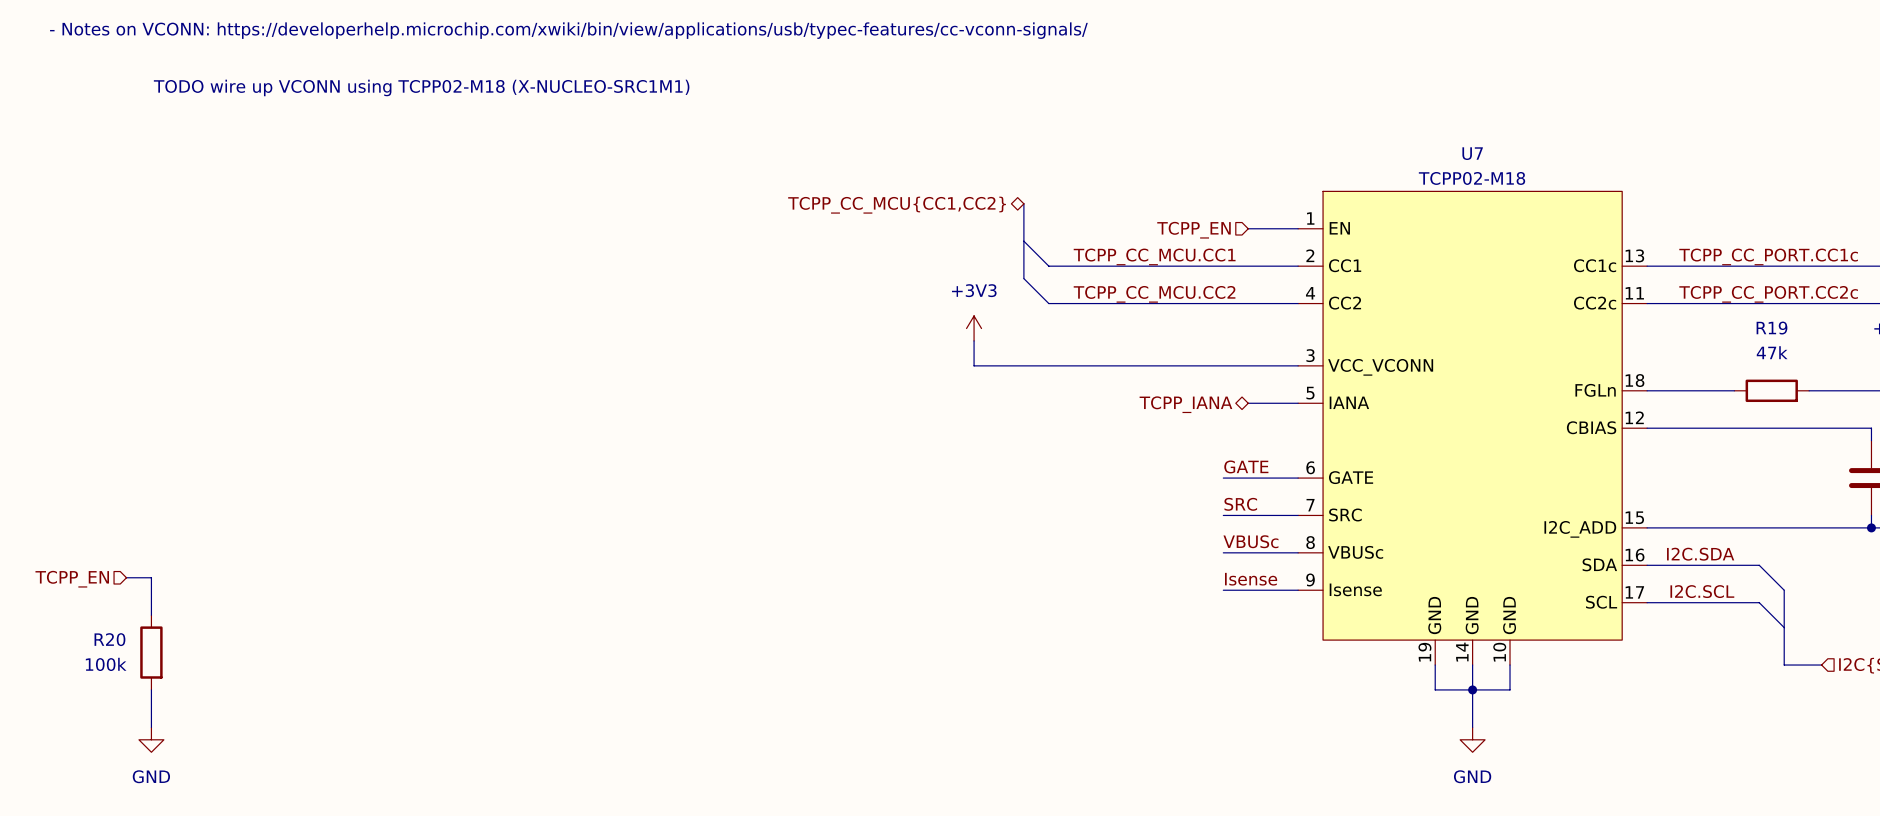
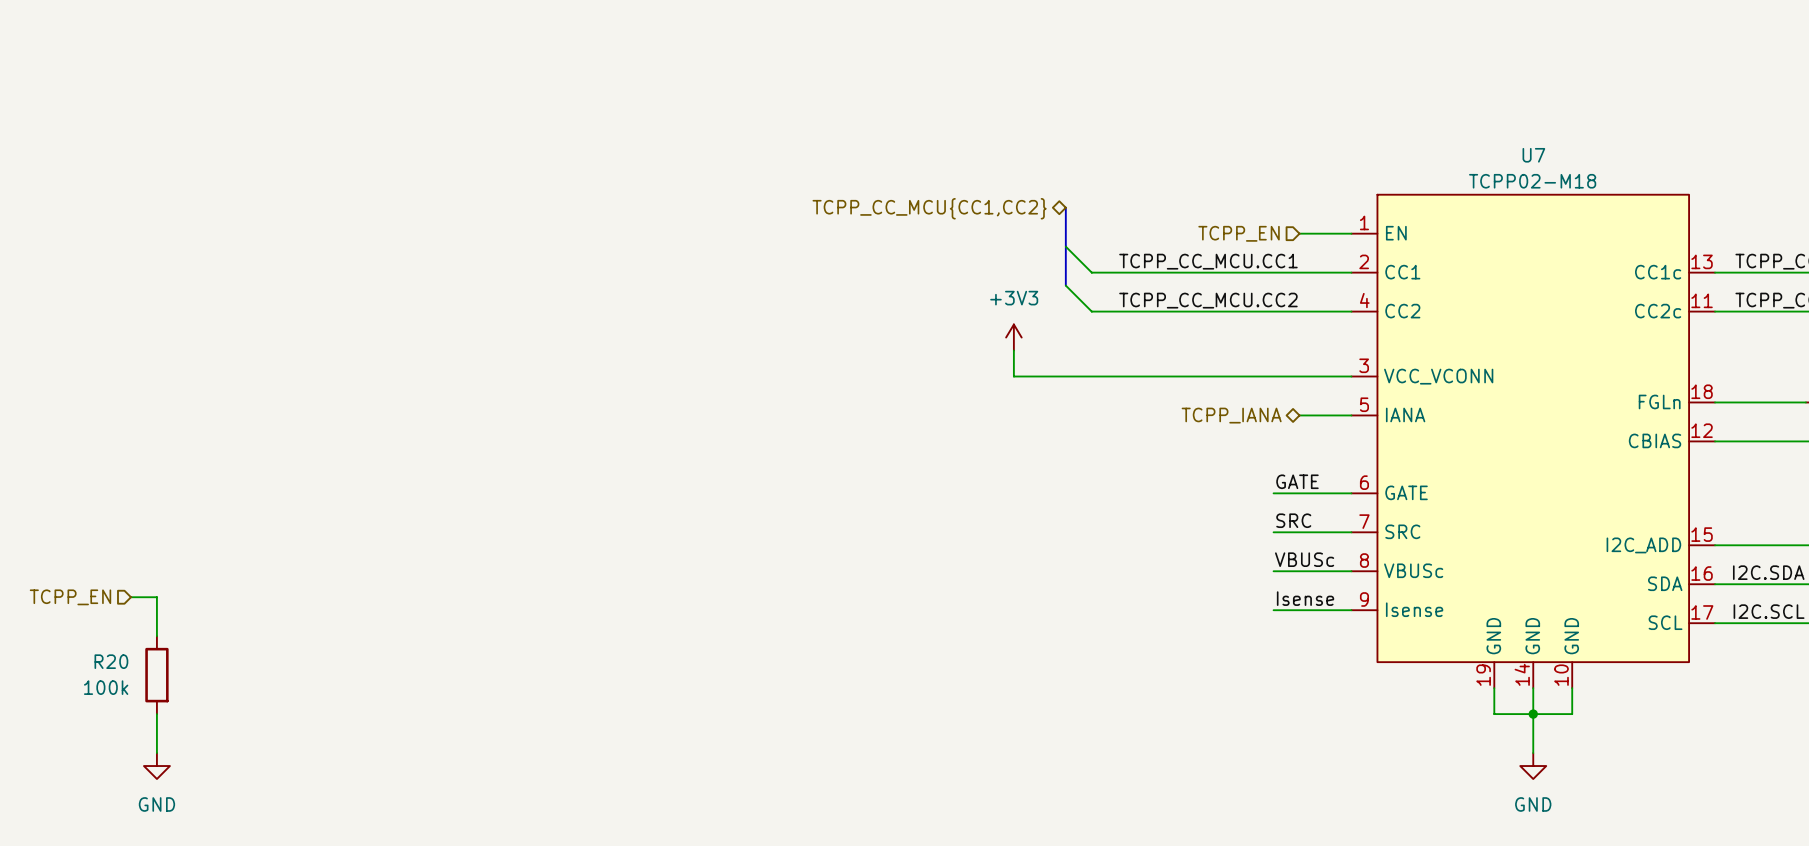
text: - Notes on VCONN: https://developerhelp.microchip.com/xwiki/bin/view/applications/usb/typec-features/cc-vconn-signals/ (568, 30) -> none
text: TODO wire up VCONN using TCPP02-M18 (X-NUCLEO-SRC1M1) (421, 87) -> none

